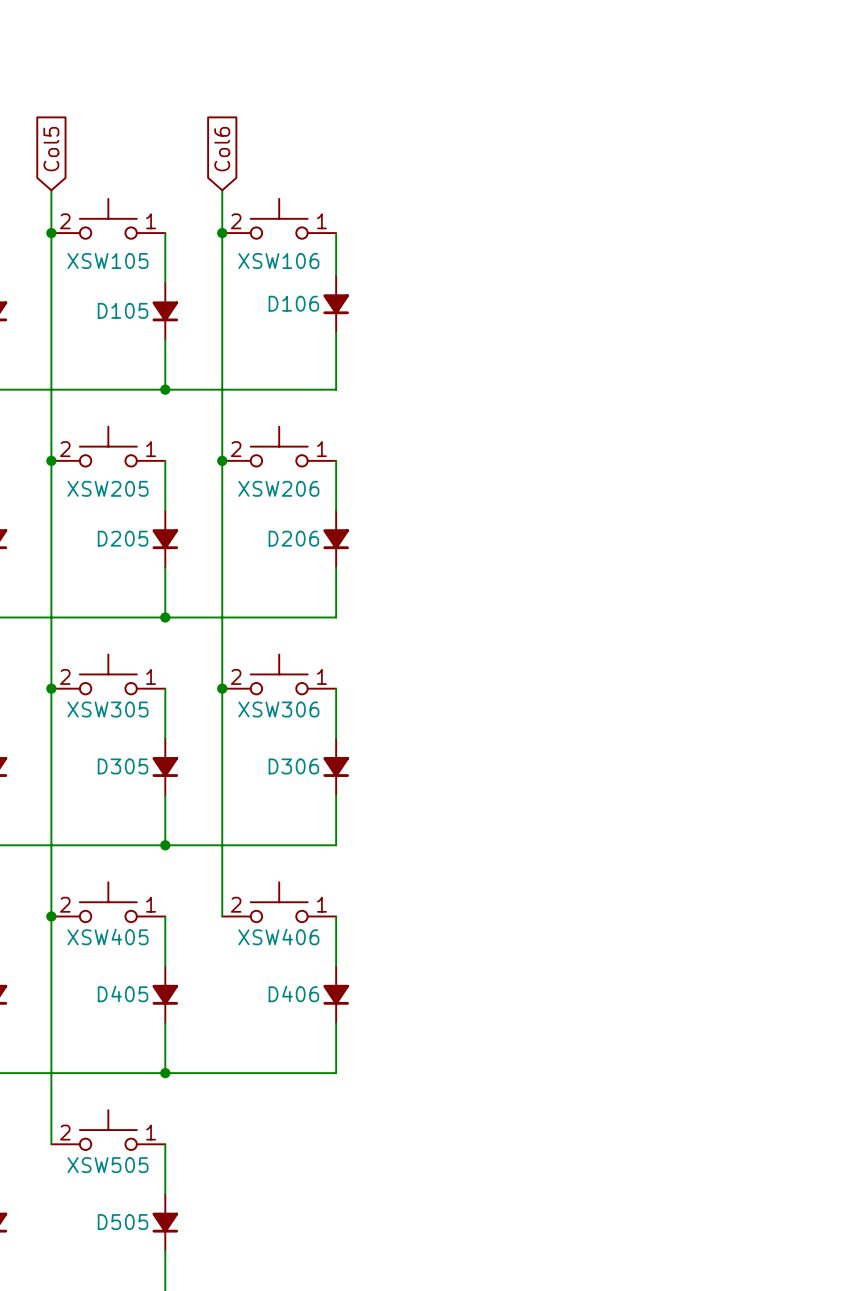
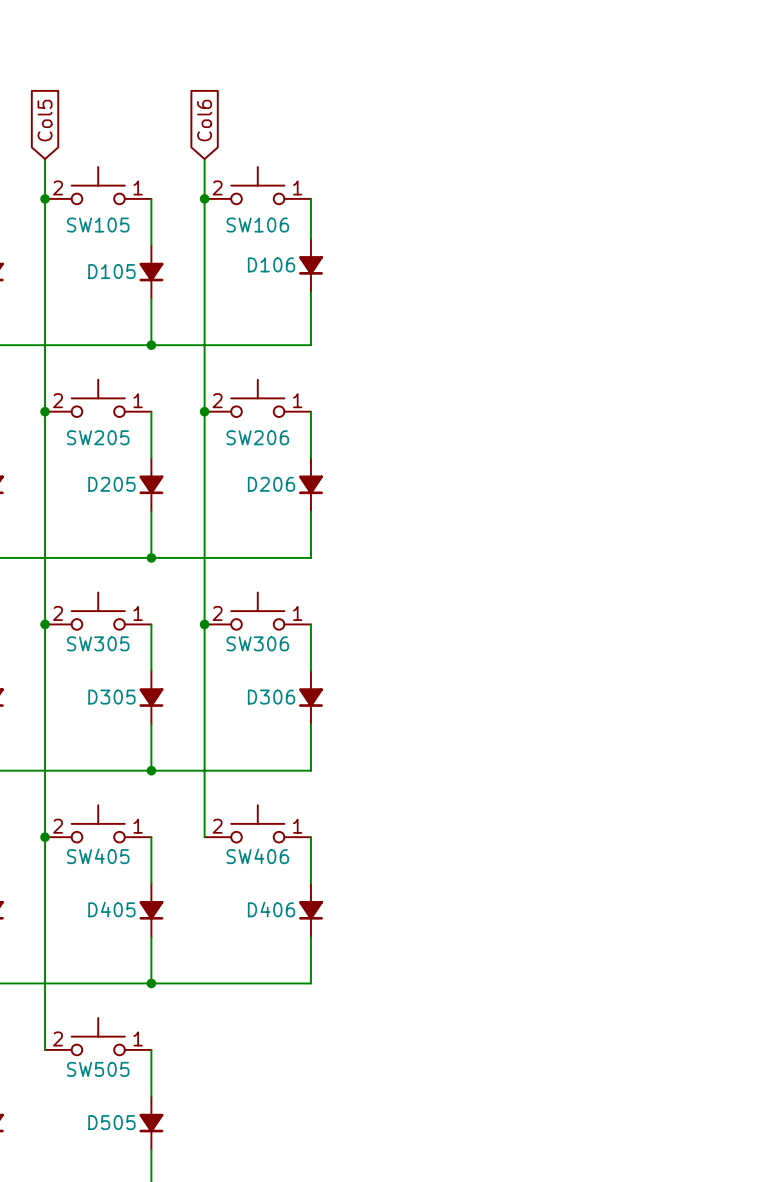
XSW105 name: XSW105 (108, 261) -> SW105 (98, 225)
XSW106 name: XSW106 (278, 261) -> SW106 (257, 225)
XSW205 name: XSW205 (108, 488) -> SW205 (98, 437)
XSW206 name: XSW206 (278, 488) -> SW206 (257, 437)
XSW305 name: XSW305 (108, 709) -> SW305 (98, 643)
XSW306 name: XSW306 (278, 709) -> SW306 (257, 643)
XSW405 name: XSW405 (108, 936) -> SW405 (98, 856)
XSW406 name: XSW406 (278, 936) -> SW406 (257, 856)
XSW505 name: XSW505 (108, 1165) -> SW505 (98, 1069)

